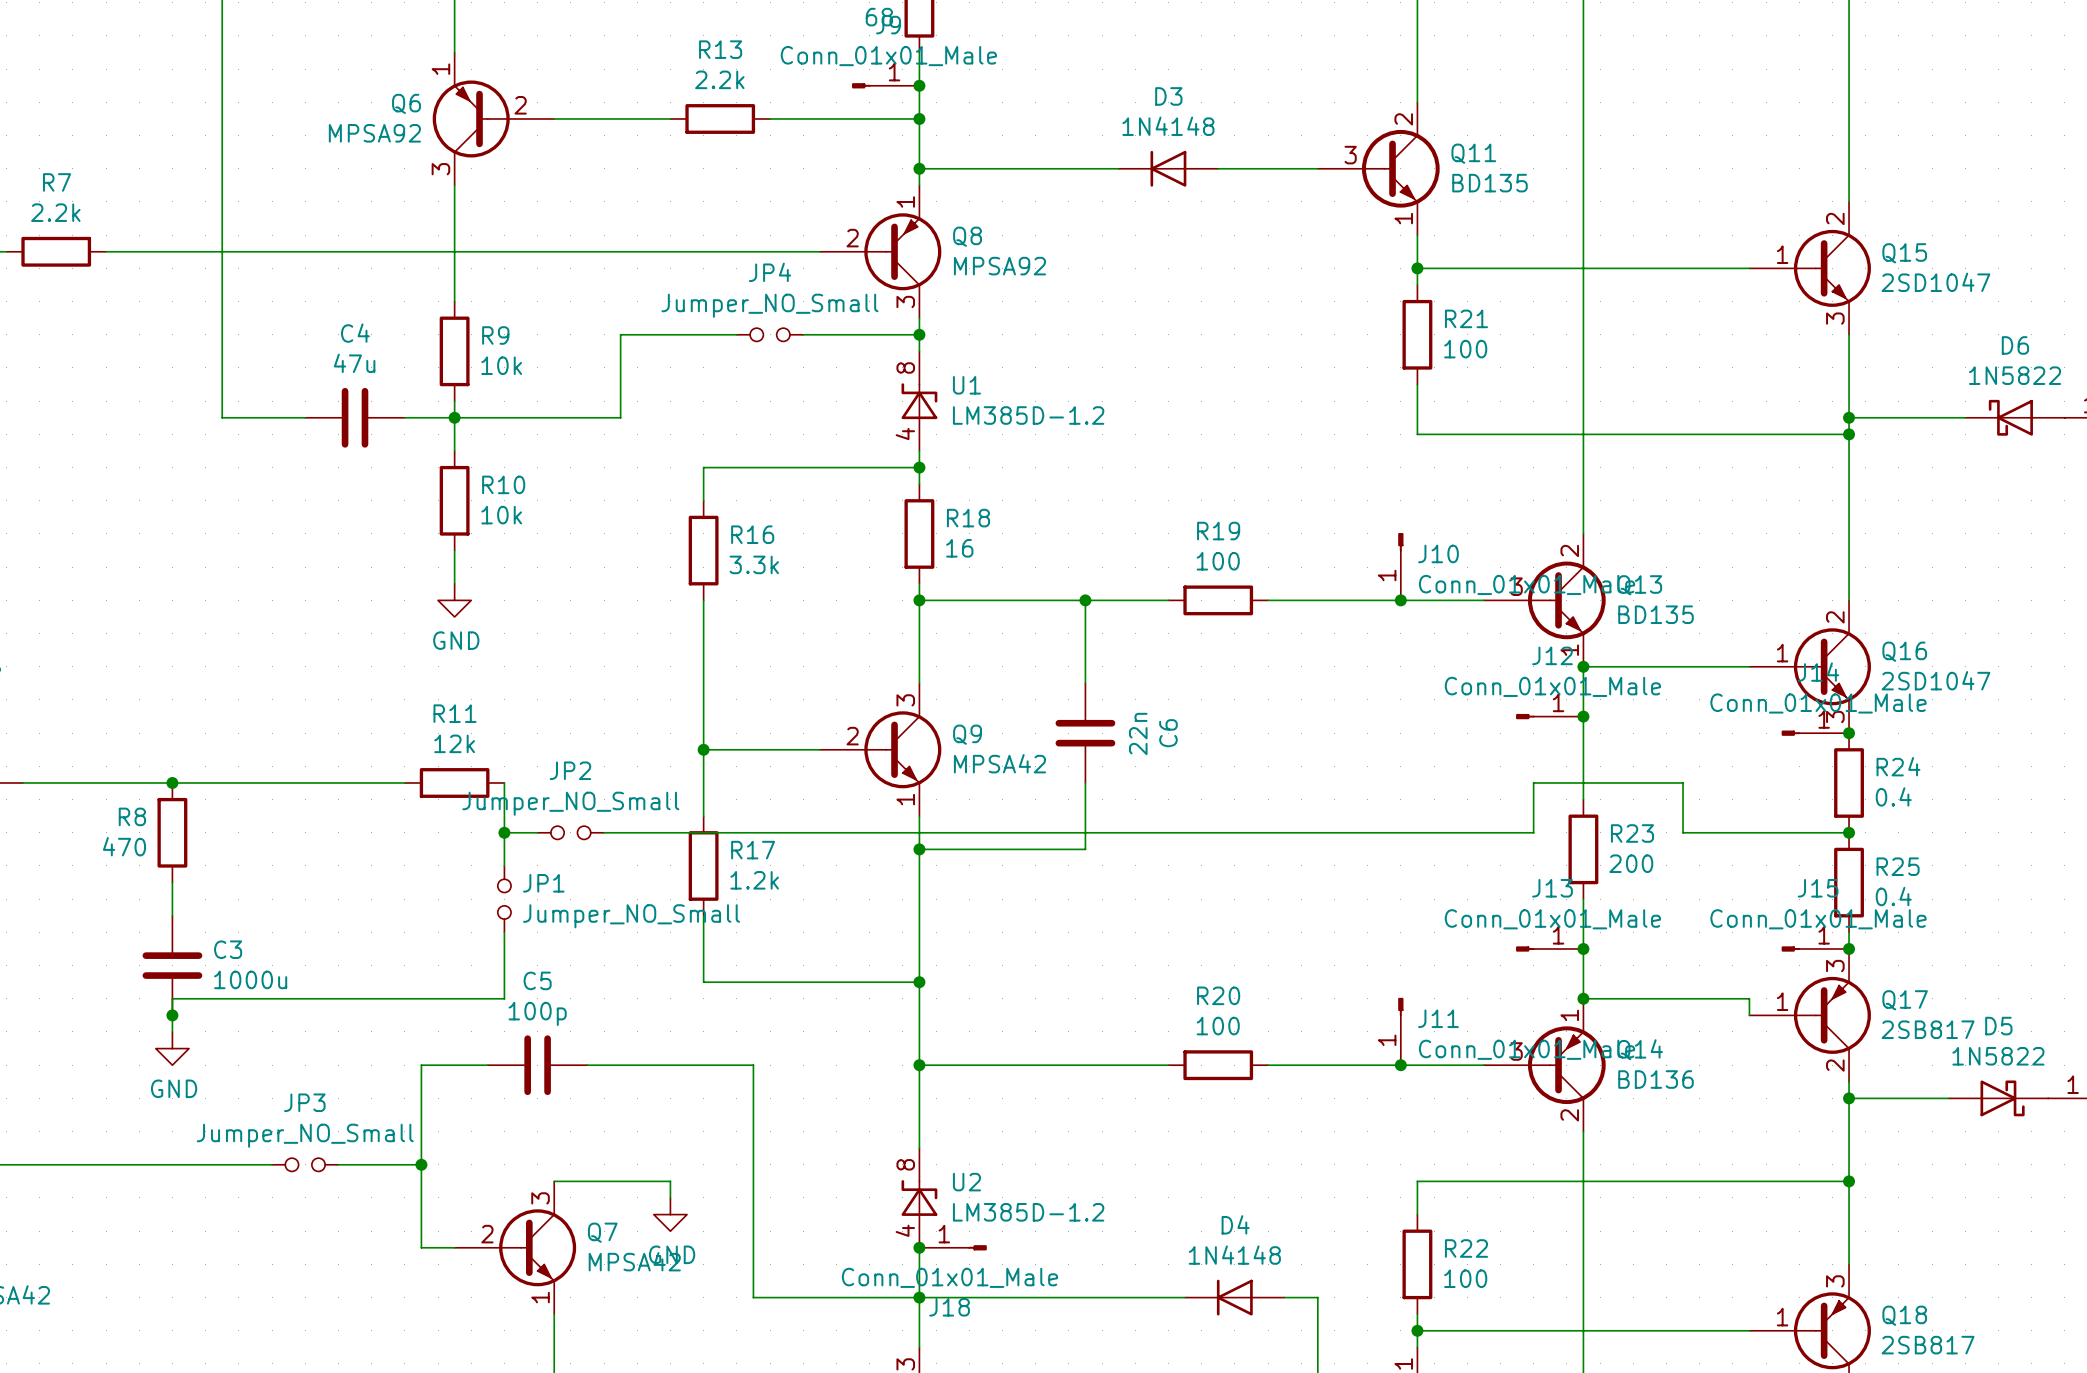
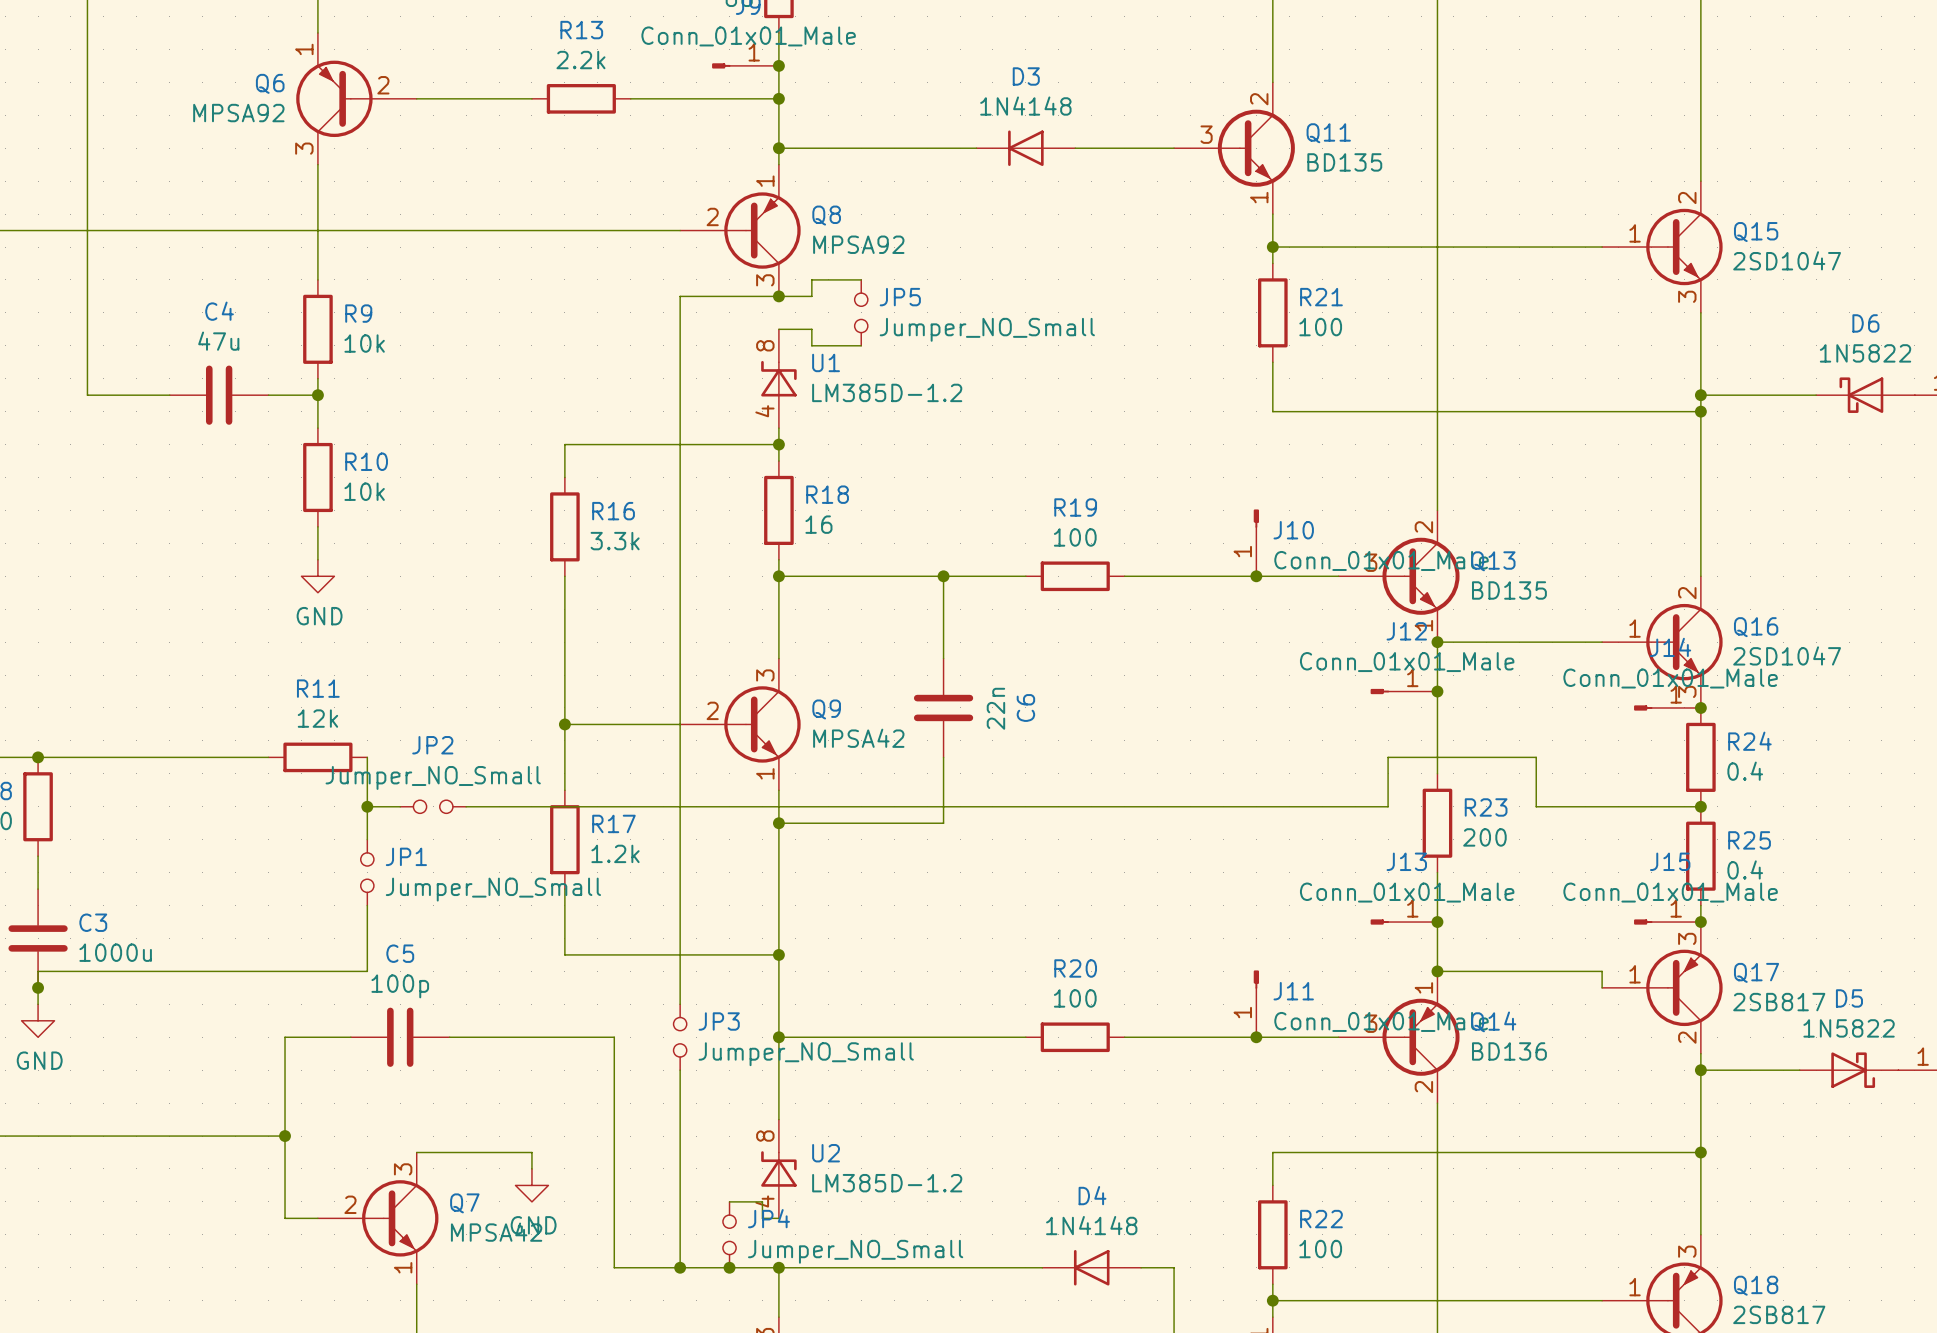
wire: none -> (861, 279) (811, 279) (811, 296) (680, 296) (680, 1004)
JP4 value position: Jumper_NO_Small (770, 305) -> Jumper_NO_Small (855, 1251)
wire: (919, 318) (919, 351) -> (861, 345) (811, 345) (811, 329) (778, 329)
wire: (736, 334) (620, 334) (620, 417) (454, 417) -> none
JP4 rotation: 0° (770, 334) -> 90° clockwise (729, 1234)
JP4 position: (770, 334) -> (729, 1234)
wire: (803, 334) (919, 334) -> none
junction position: (919, 334) -> (778, 296)
JP5: none -> Jumper_NO_Small (861, 312)
wire: none -> (680, 1070) (680, 1267)
JP3 value position: Jumper_NO_Small (305, 1135) -> Jumper_NO_Small (806, 1054)
wire: none -> (136, 1136) (202, 1136)
JP3 rotation: 0° (305, 1164) -> 90° clockwise (680, 1037)
JP3 position: (305, 1164) -> (680, 1037)
wire: (919, 1247) (919, 1297) -> (778, 1218) (762, 1218) (762, 1201) (729, 1201)
junction: (919, 1247) -> none
J18: Conn_01x01_Male (953, 1247) -> none
junction: none -> (680, 1267)
junction: none -> (729, 1267)

